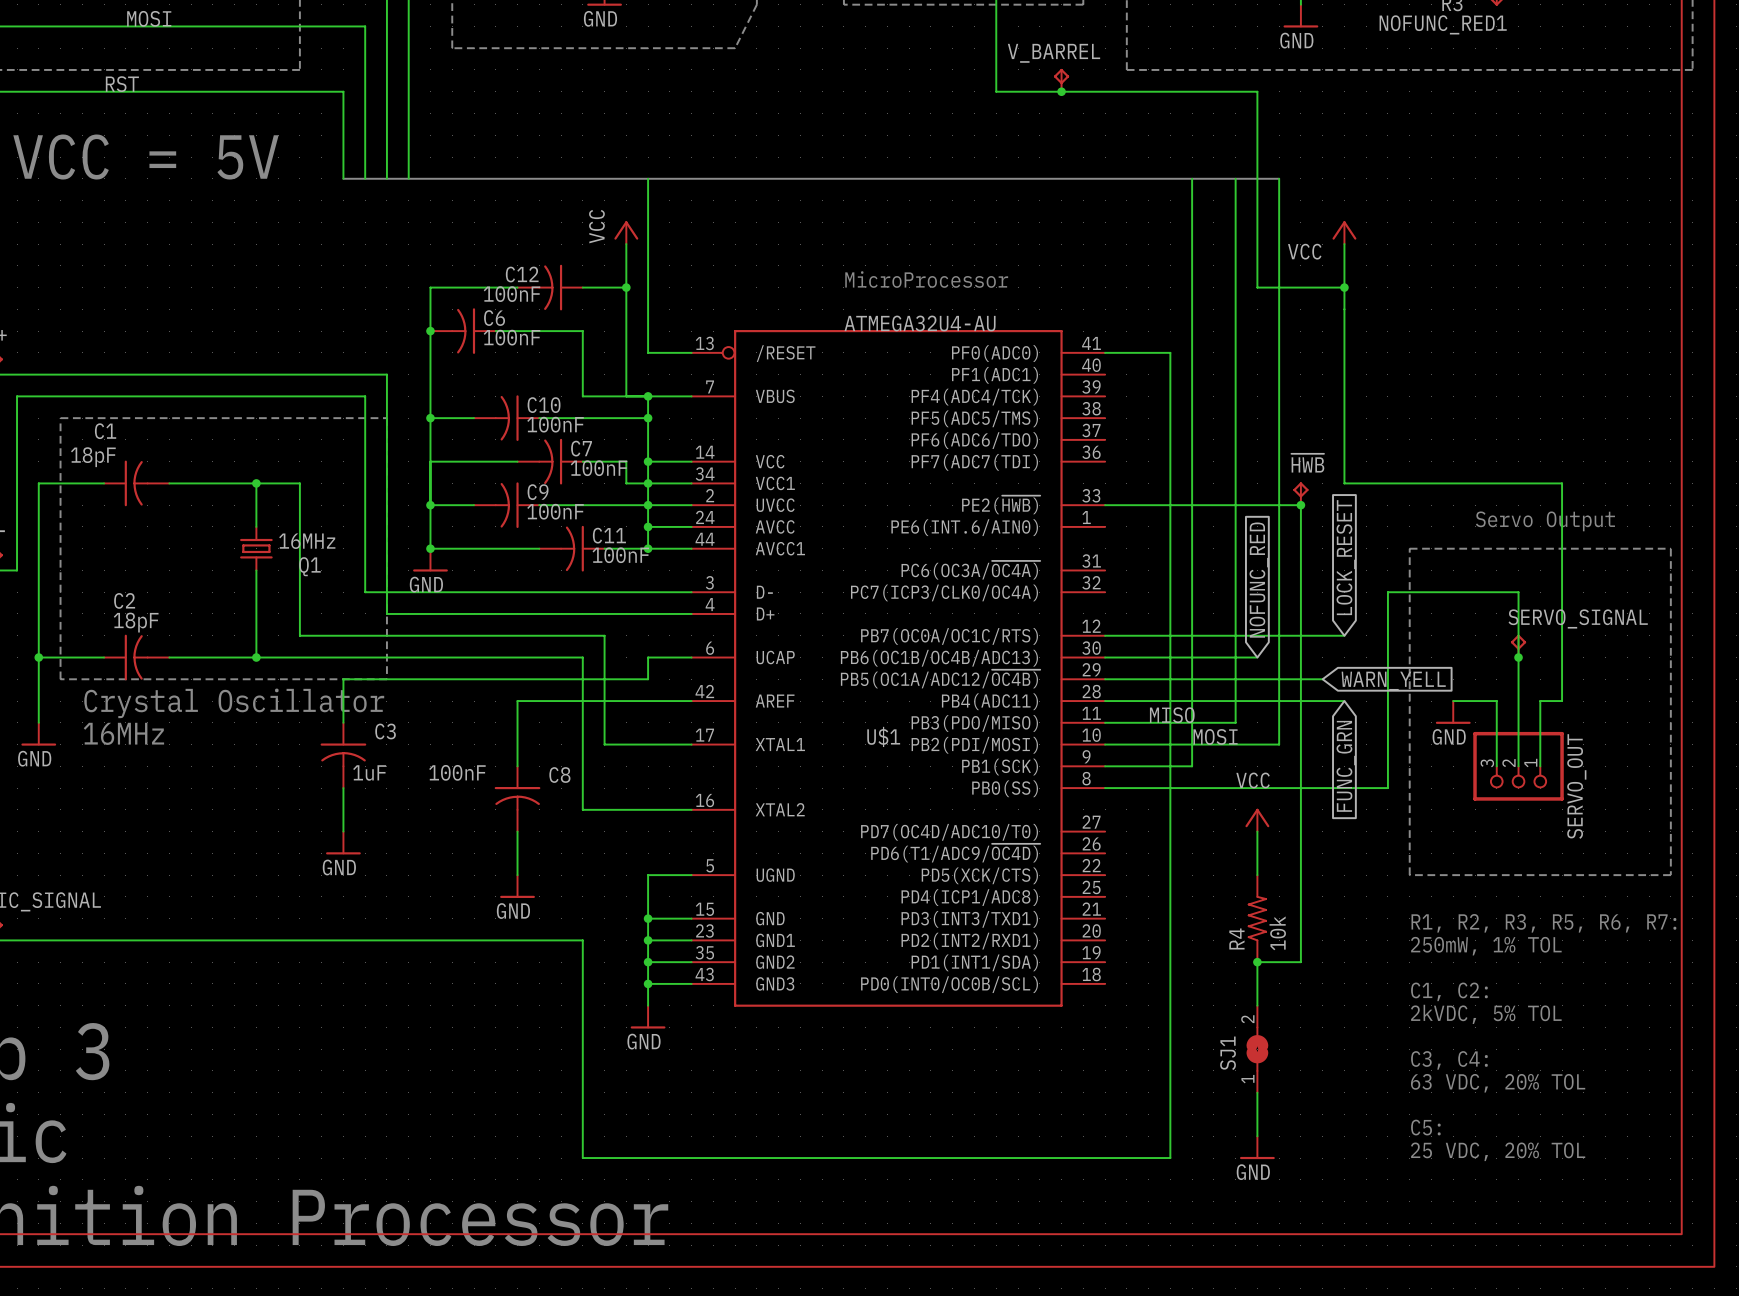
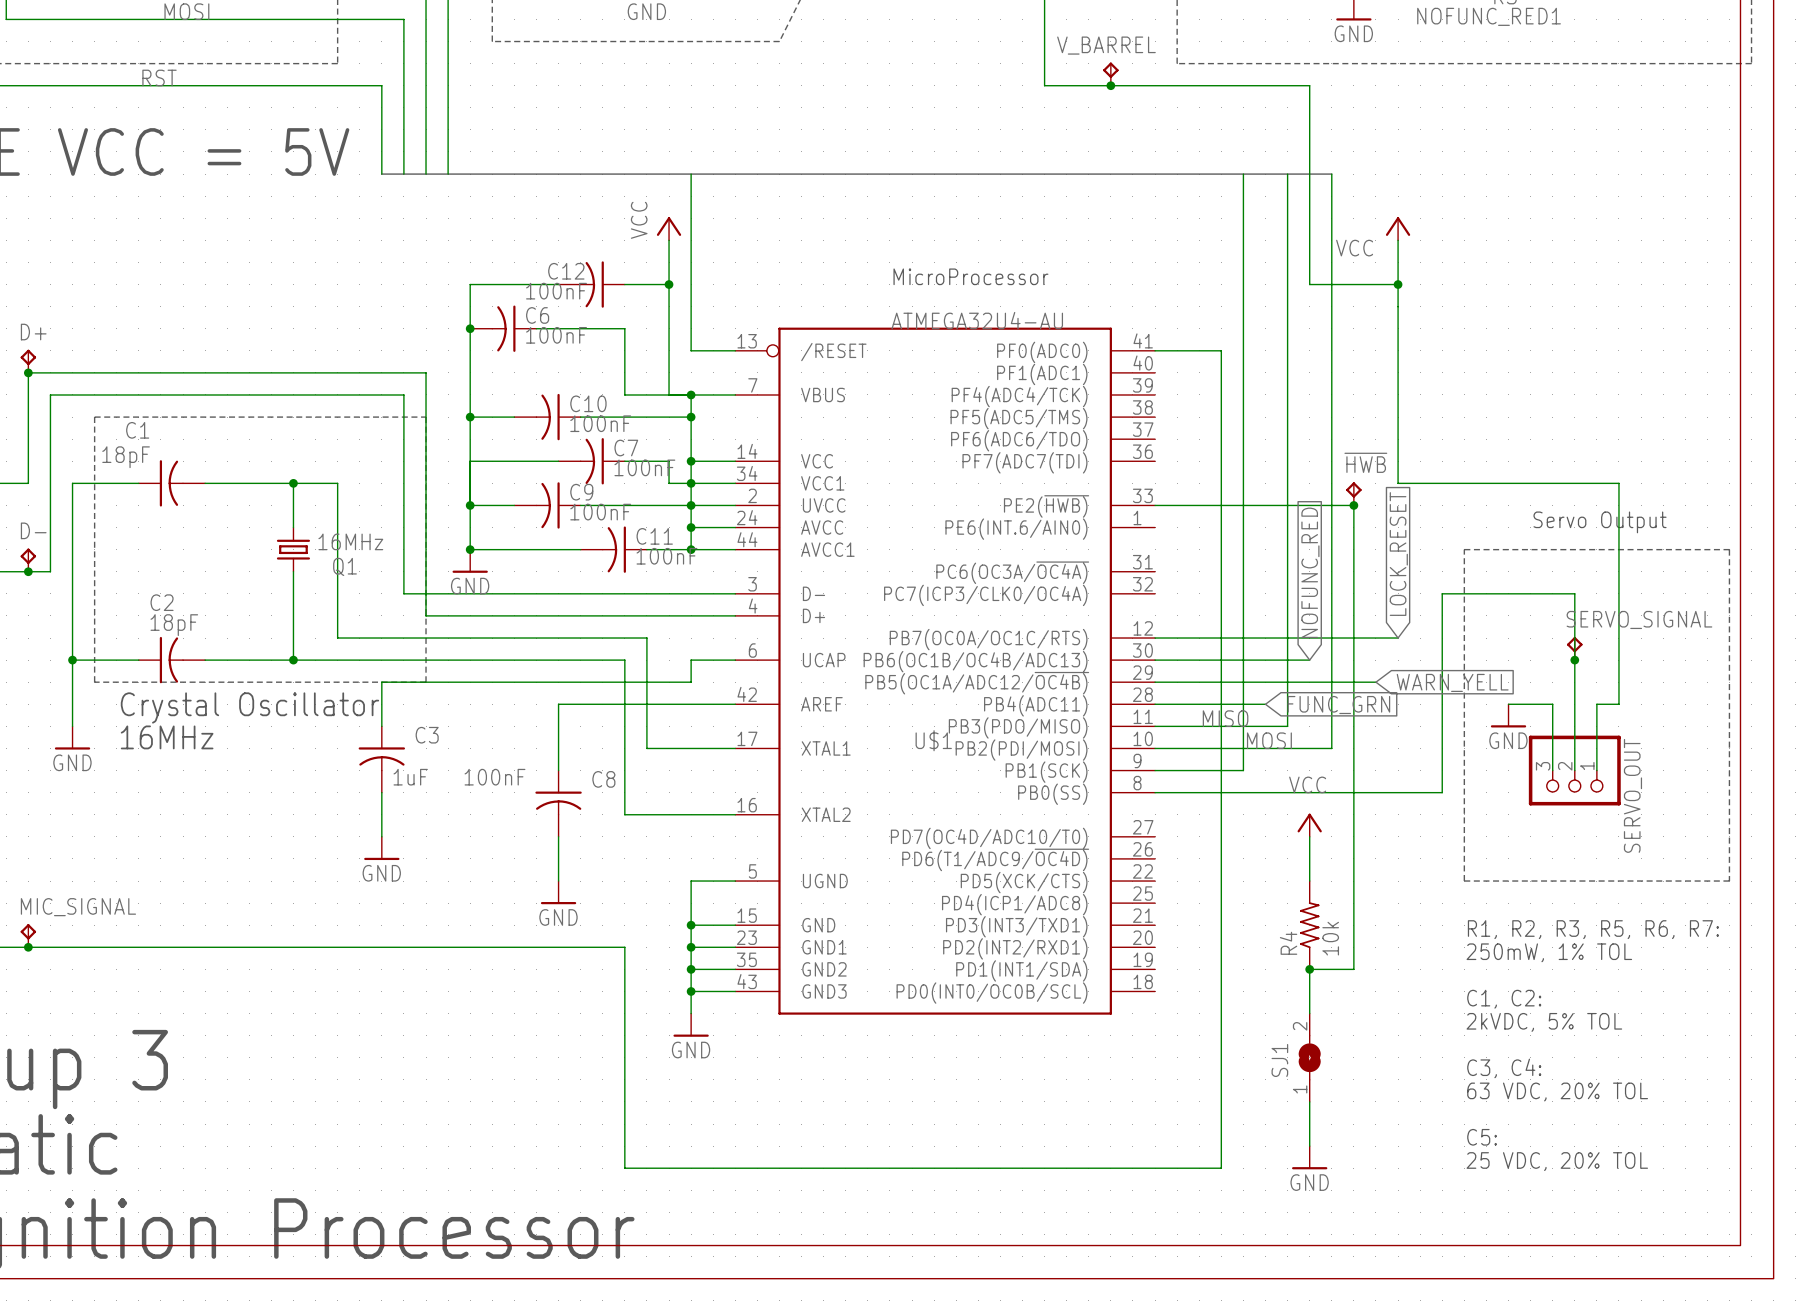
wire: (1213, 701) (1344, 701) -> none
global label rotation: 0° (1346, 766) -> 90° counterclockwise (1338, 705)

